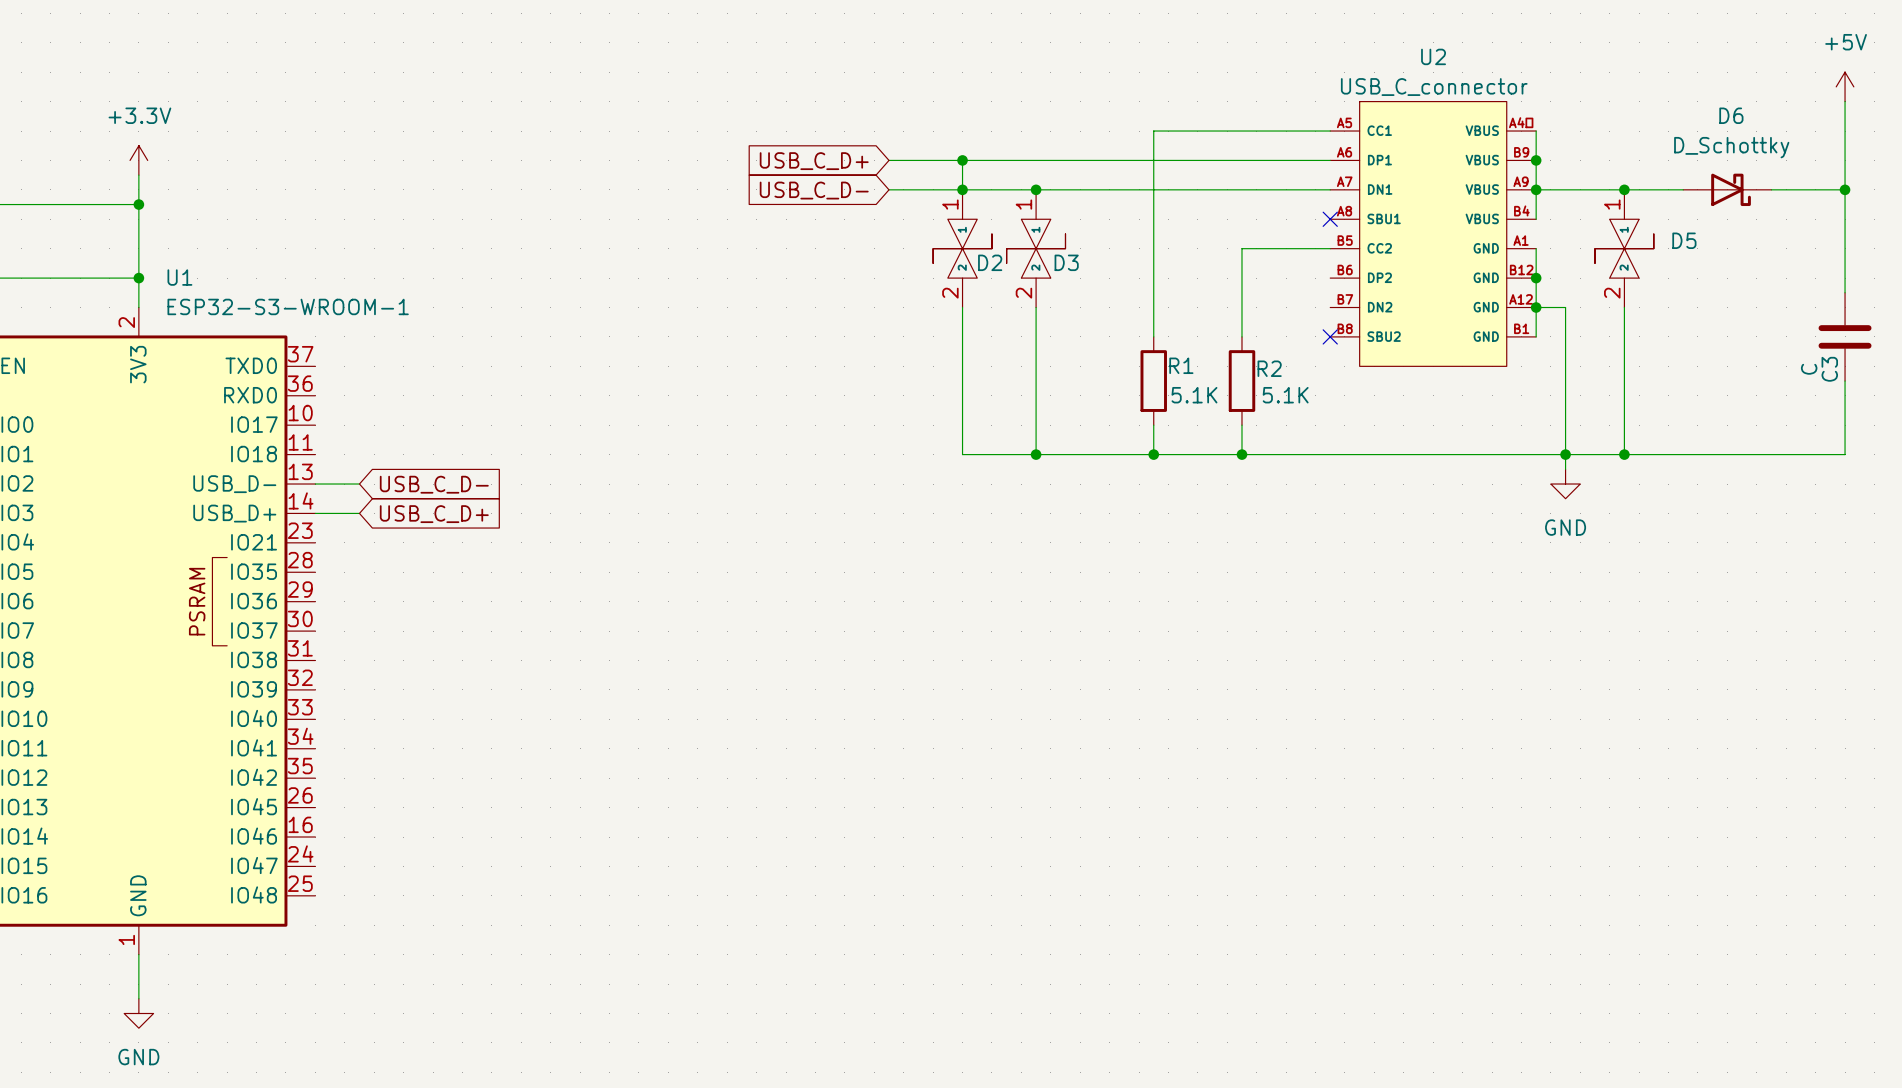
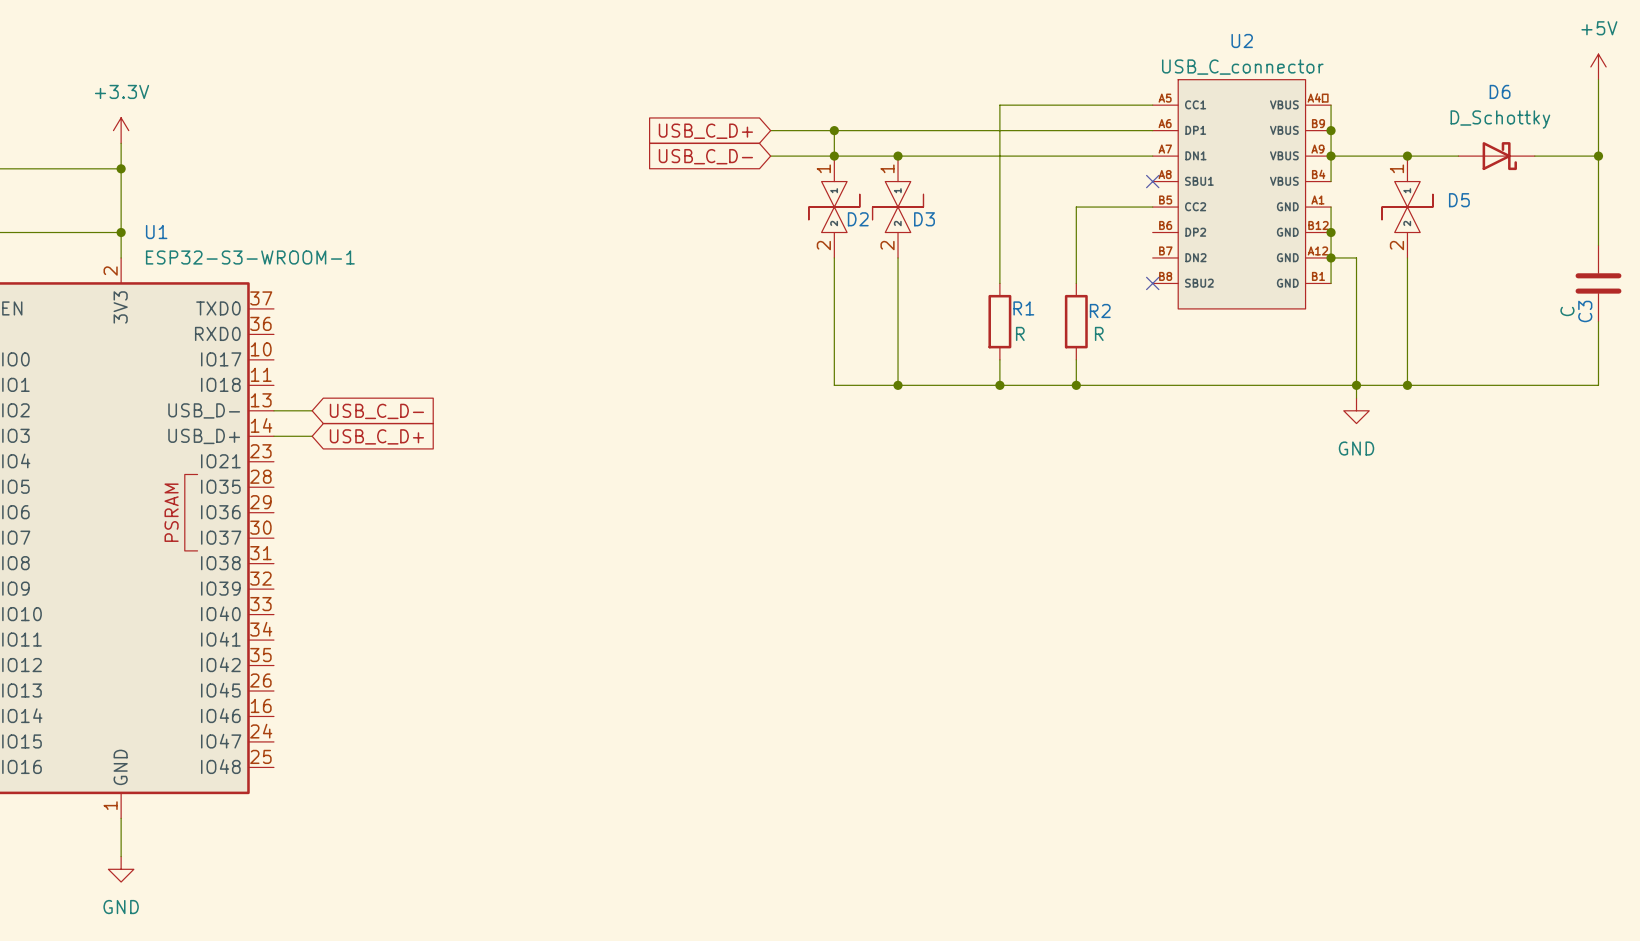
R1 value: 5.1K (1194, 395) -> R (1020, 333)
R2 value: 5.1K (1285, 395) -> R (1099, 333)

